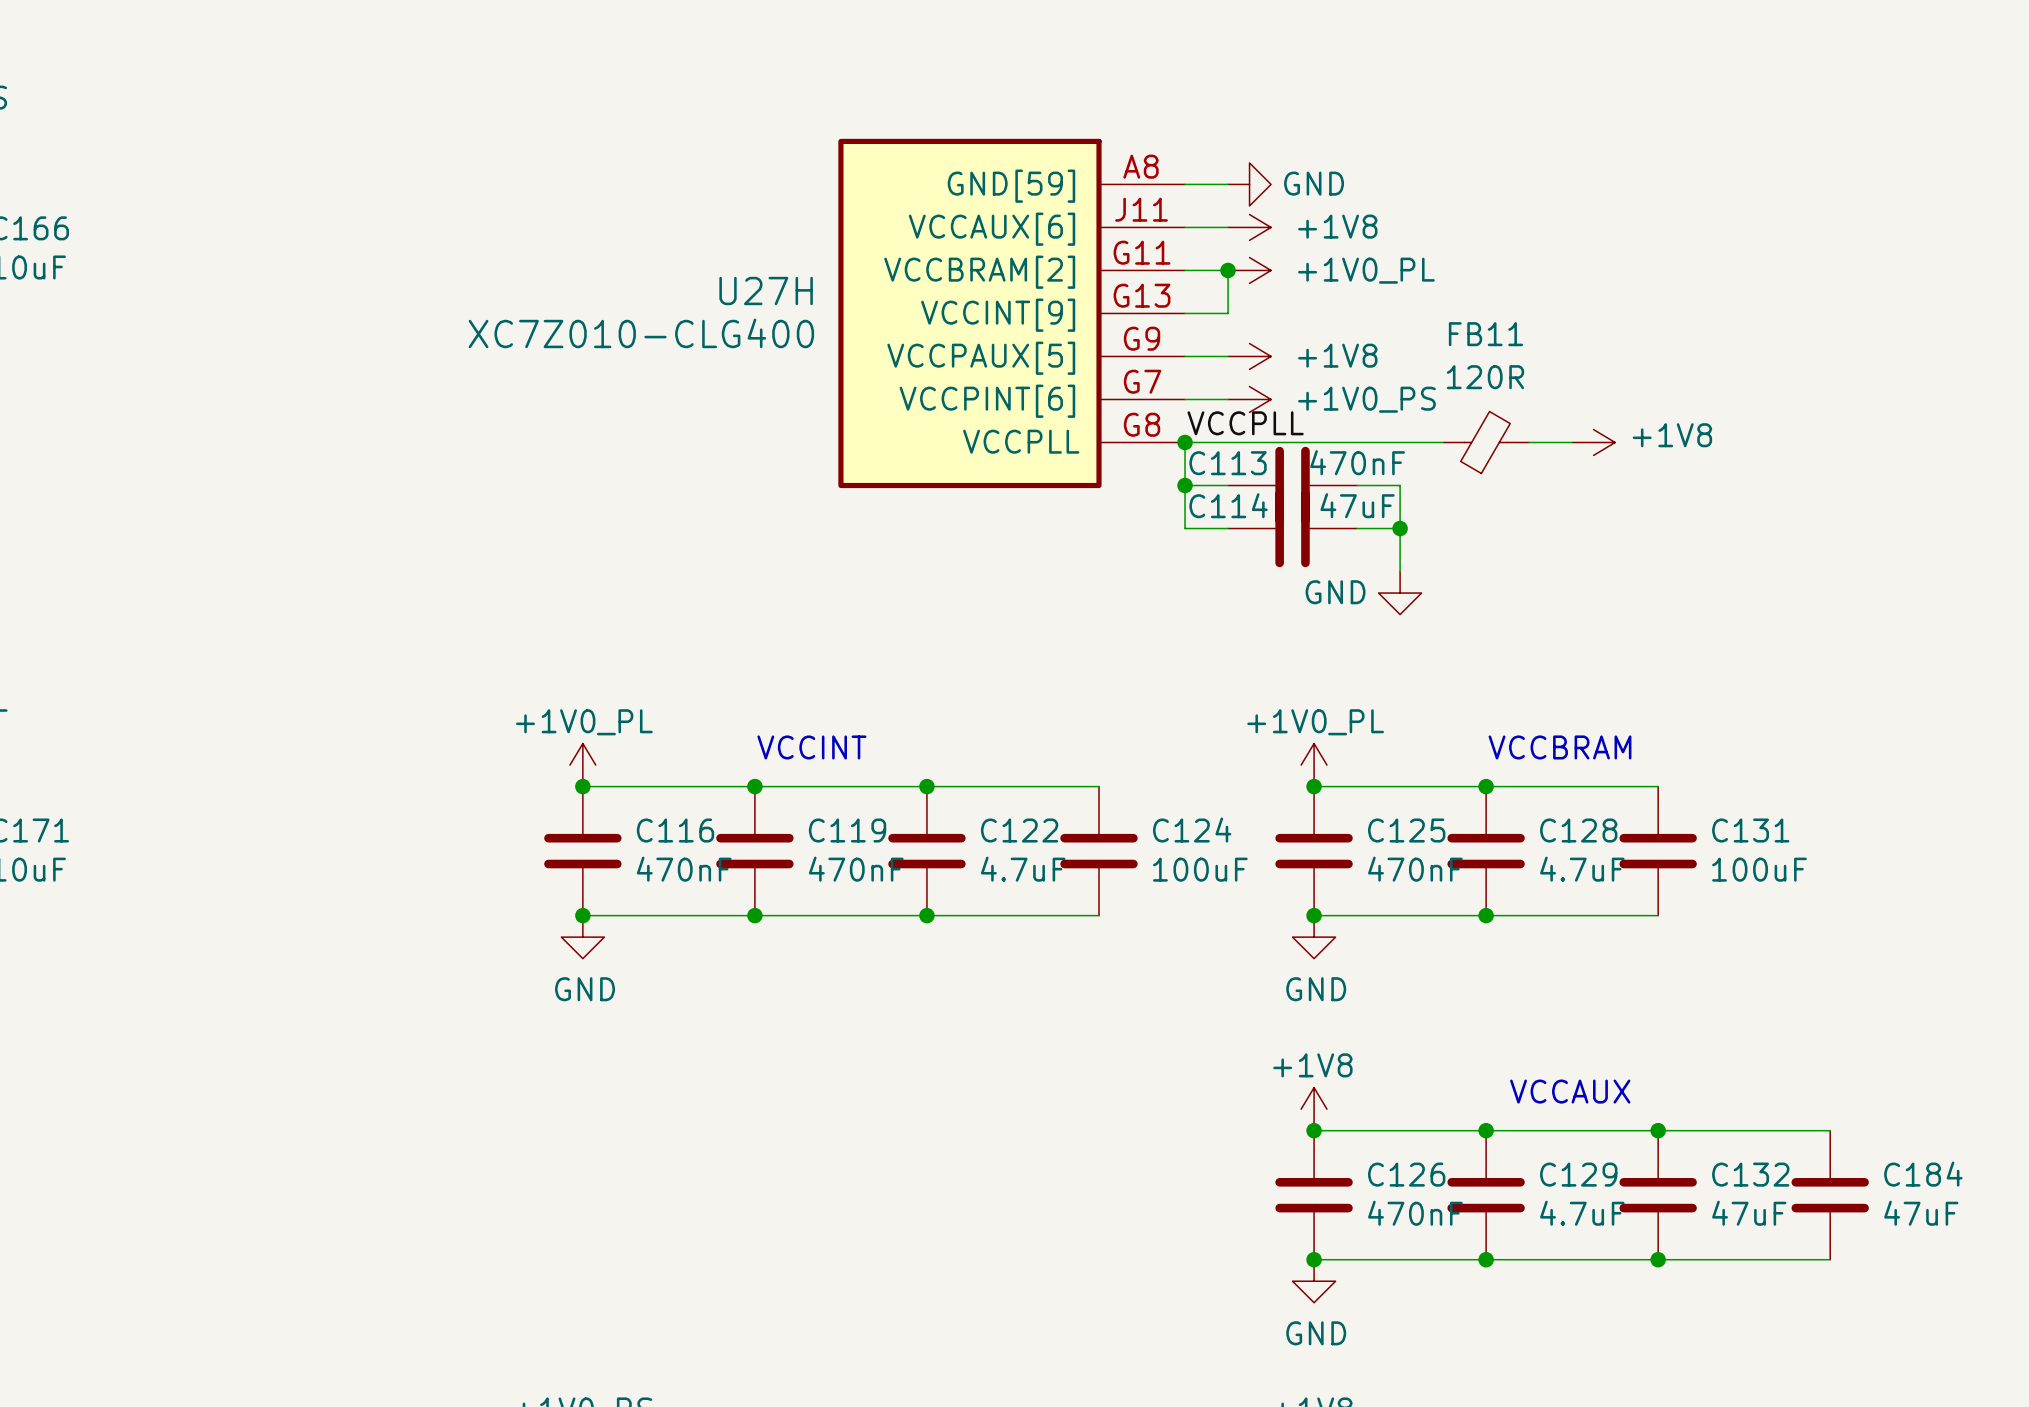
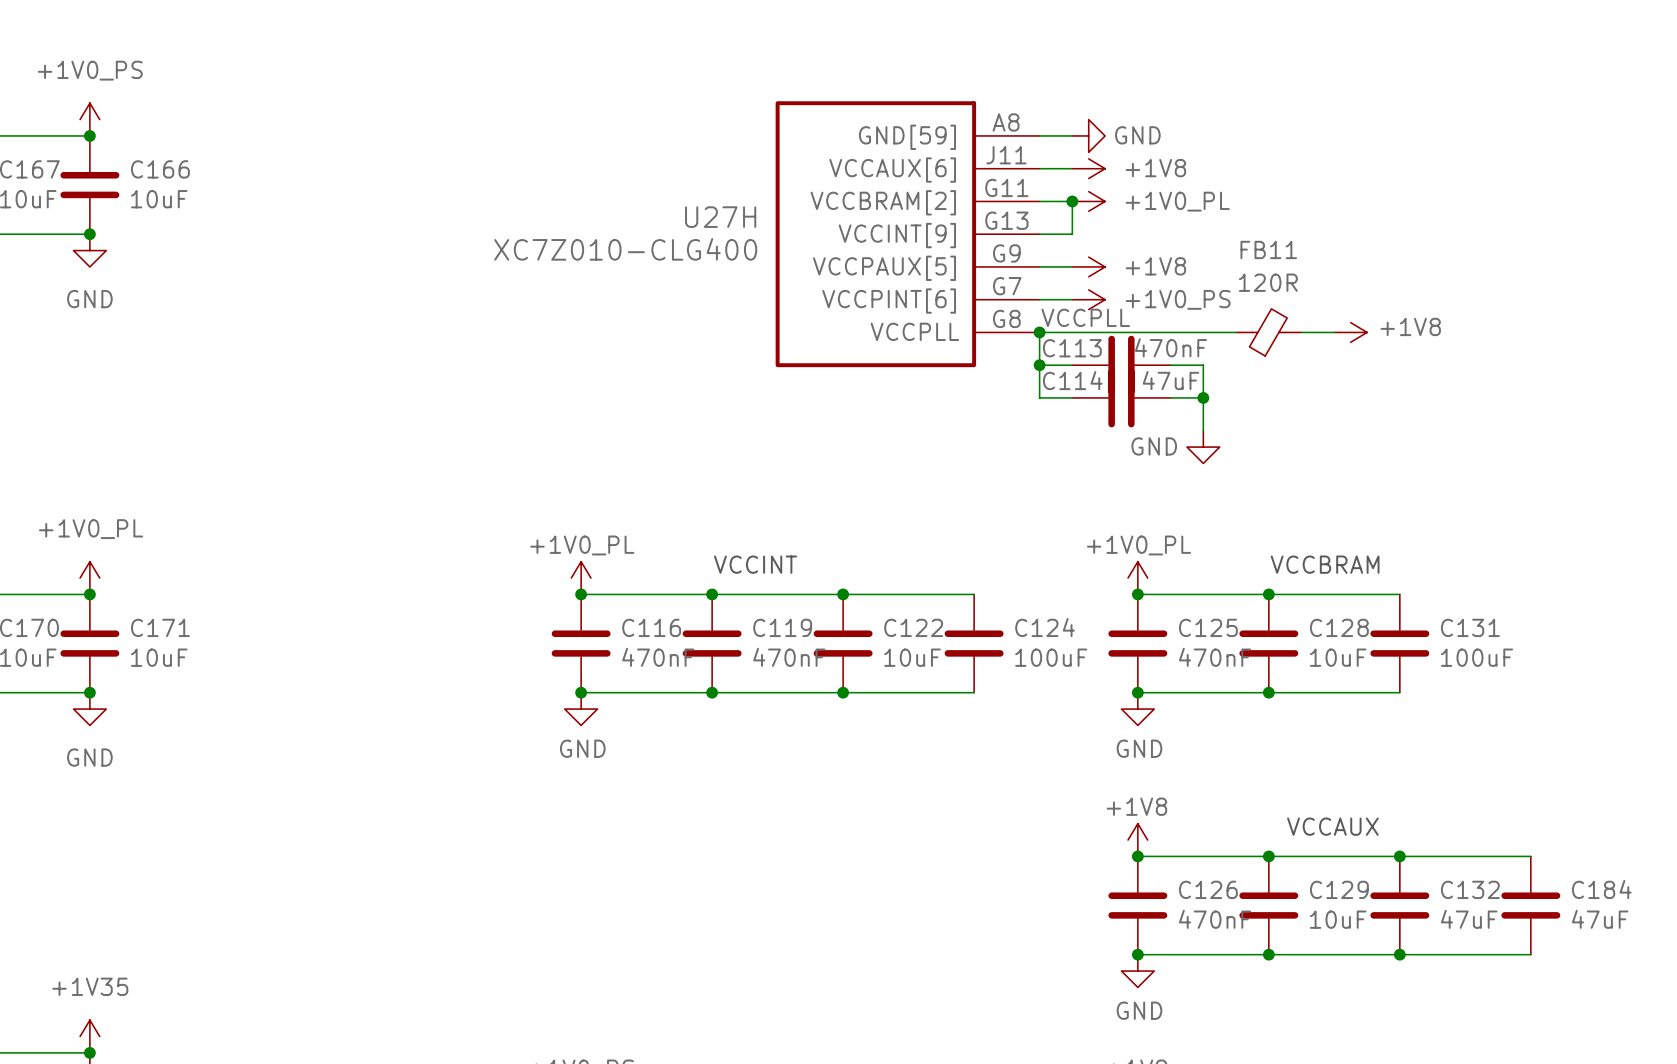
C122 value: 4.7uF (1023, 869) -> 10uF (912, 657)
C128 value: 4.7uF (1582, 869) -> 10uF (1338, 657)
C129 value: 4.7uF (1582, 1213) -> 10uF (1338, 919)

